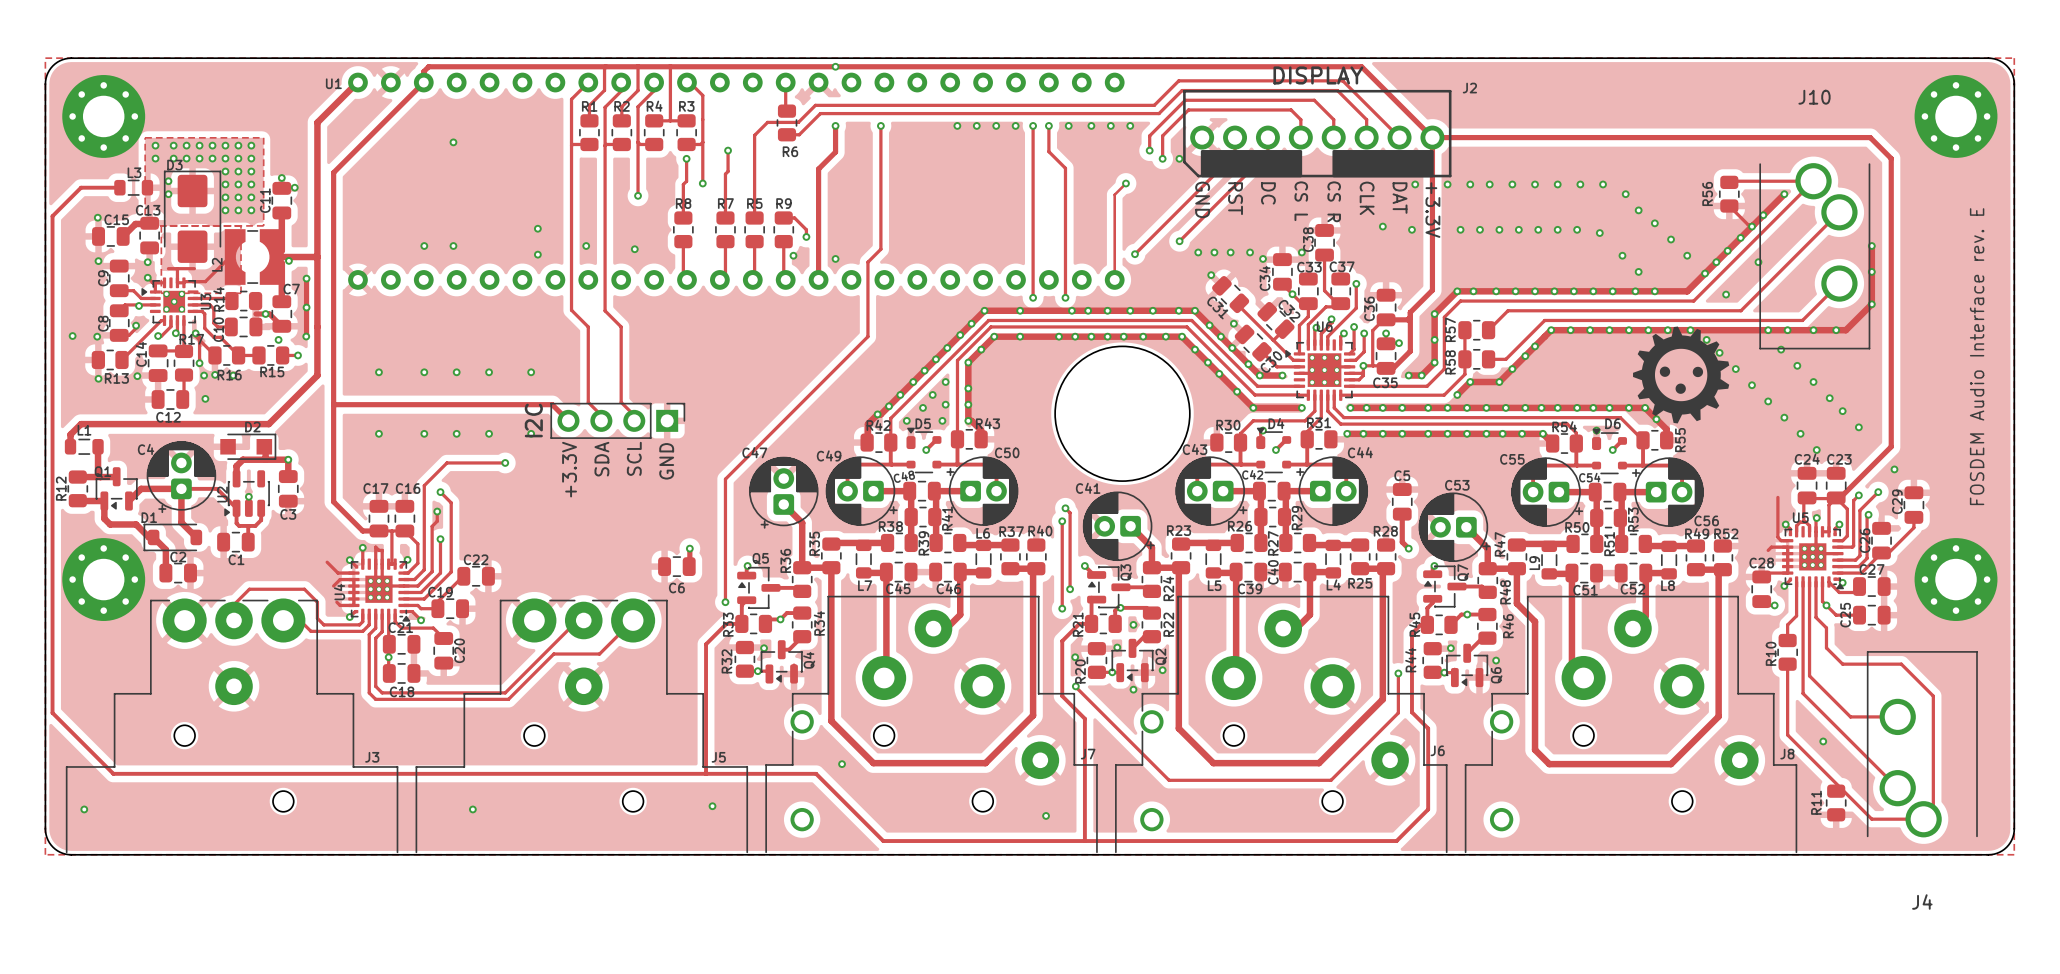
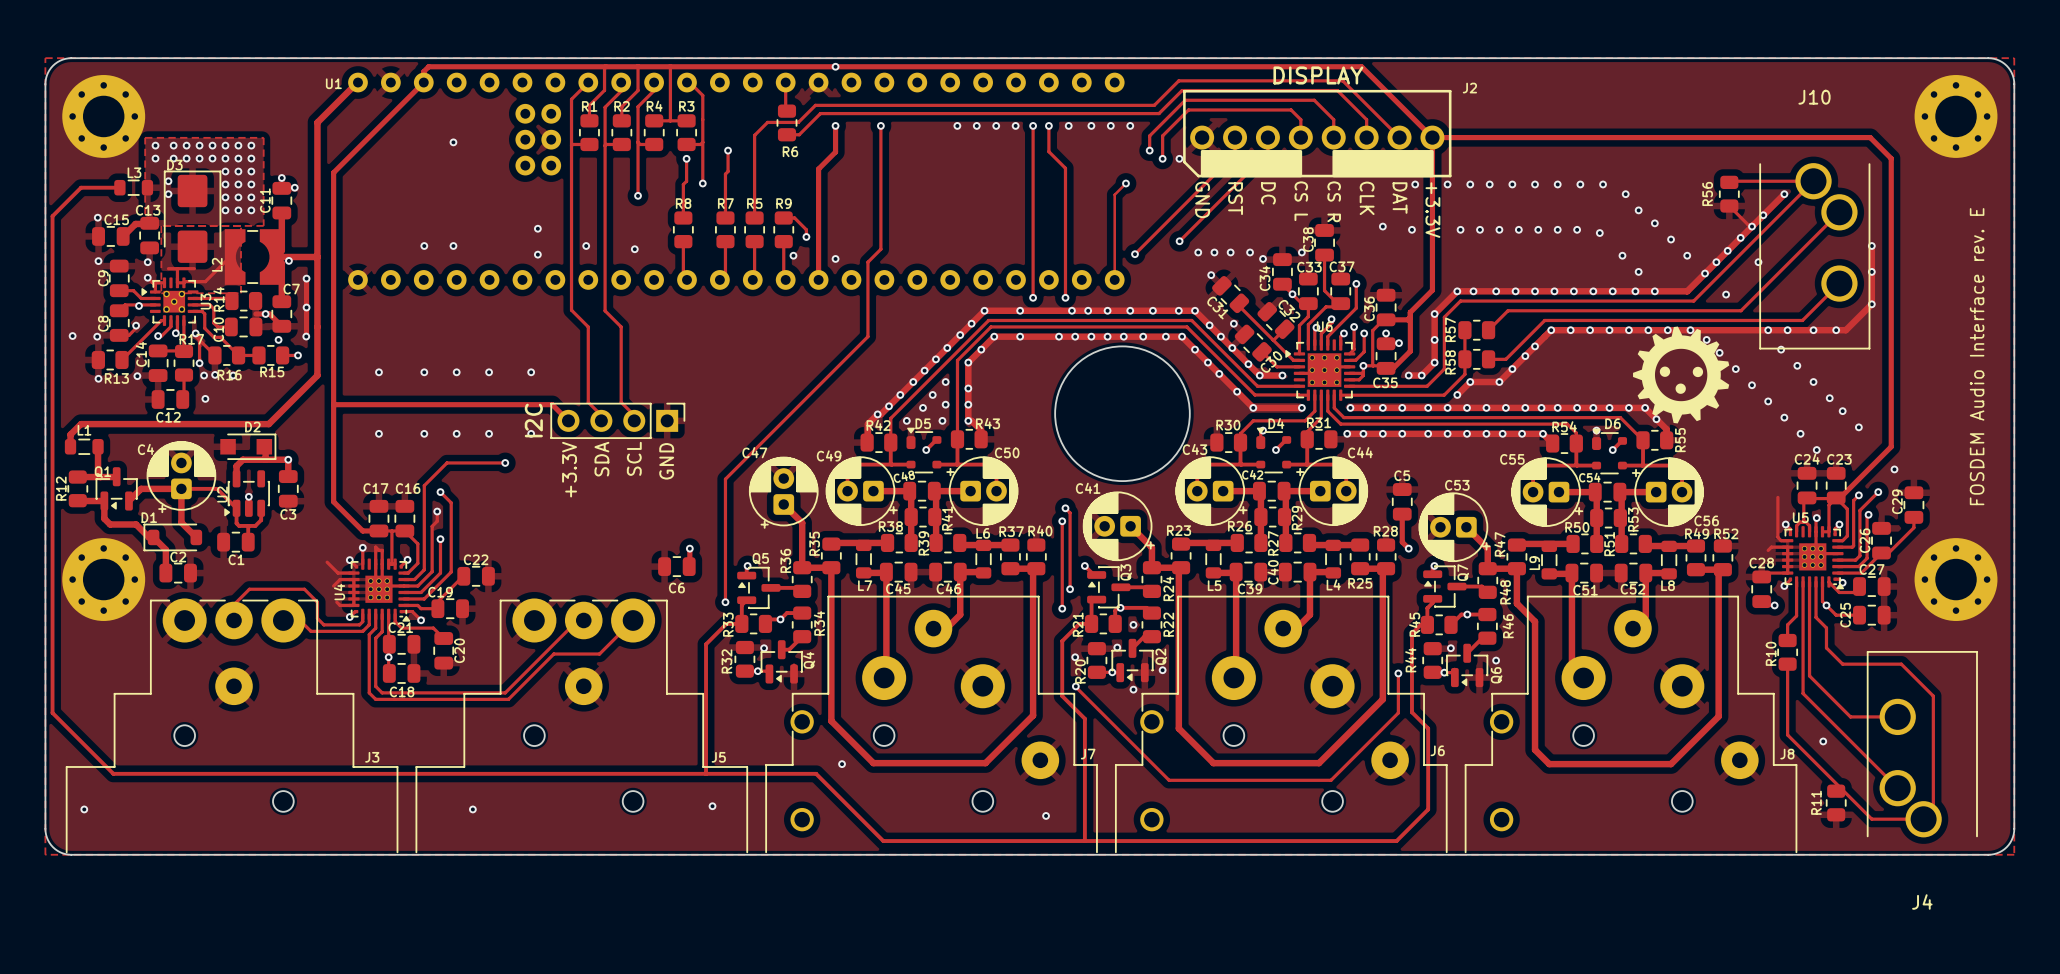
U1 footprint: [348, 72, 1125, 290] -> [348, 72, 1125, 290]

